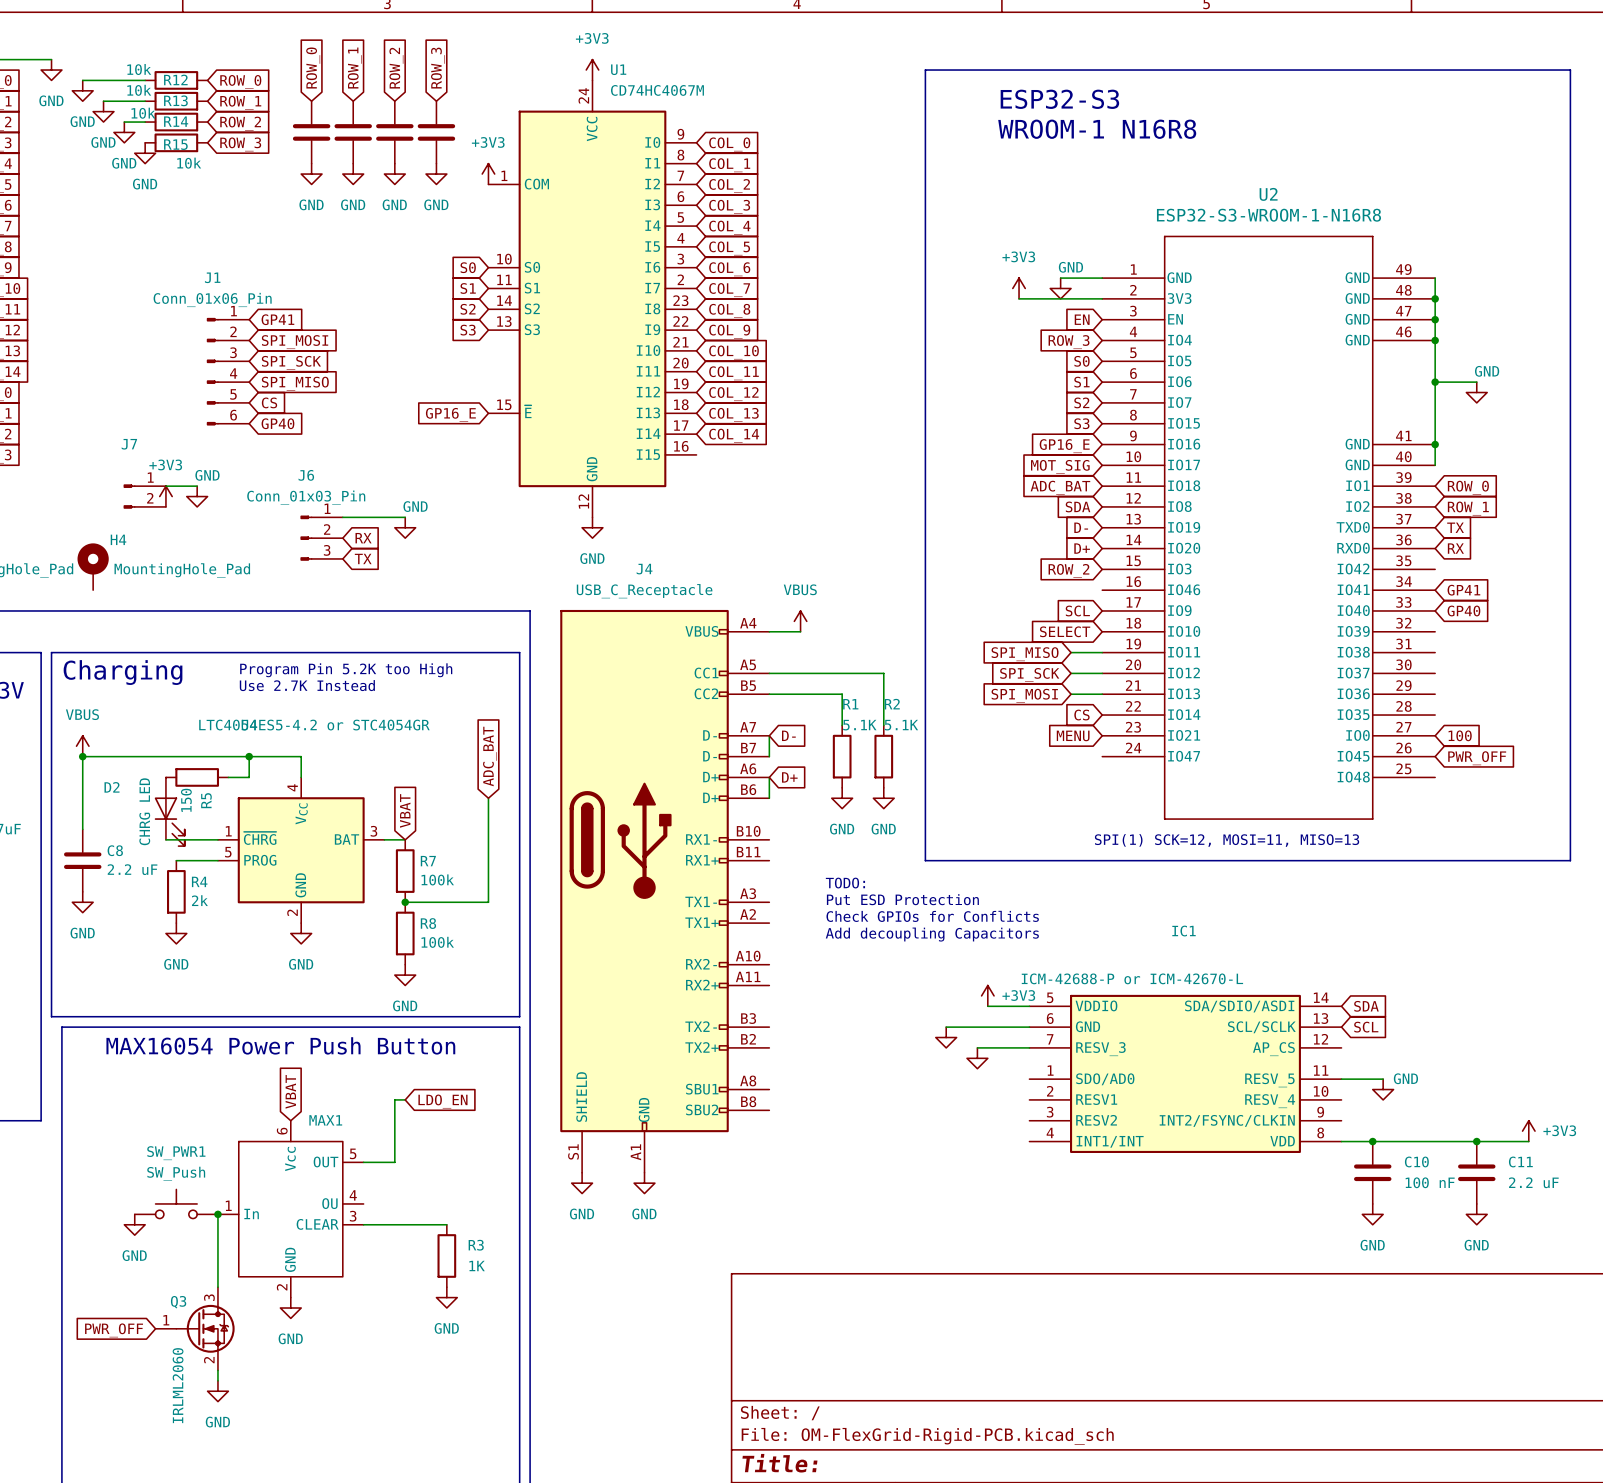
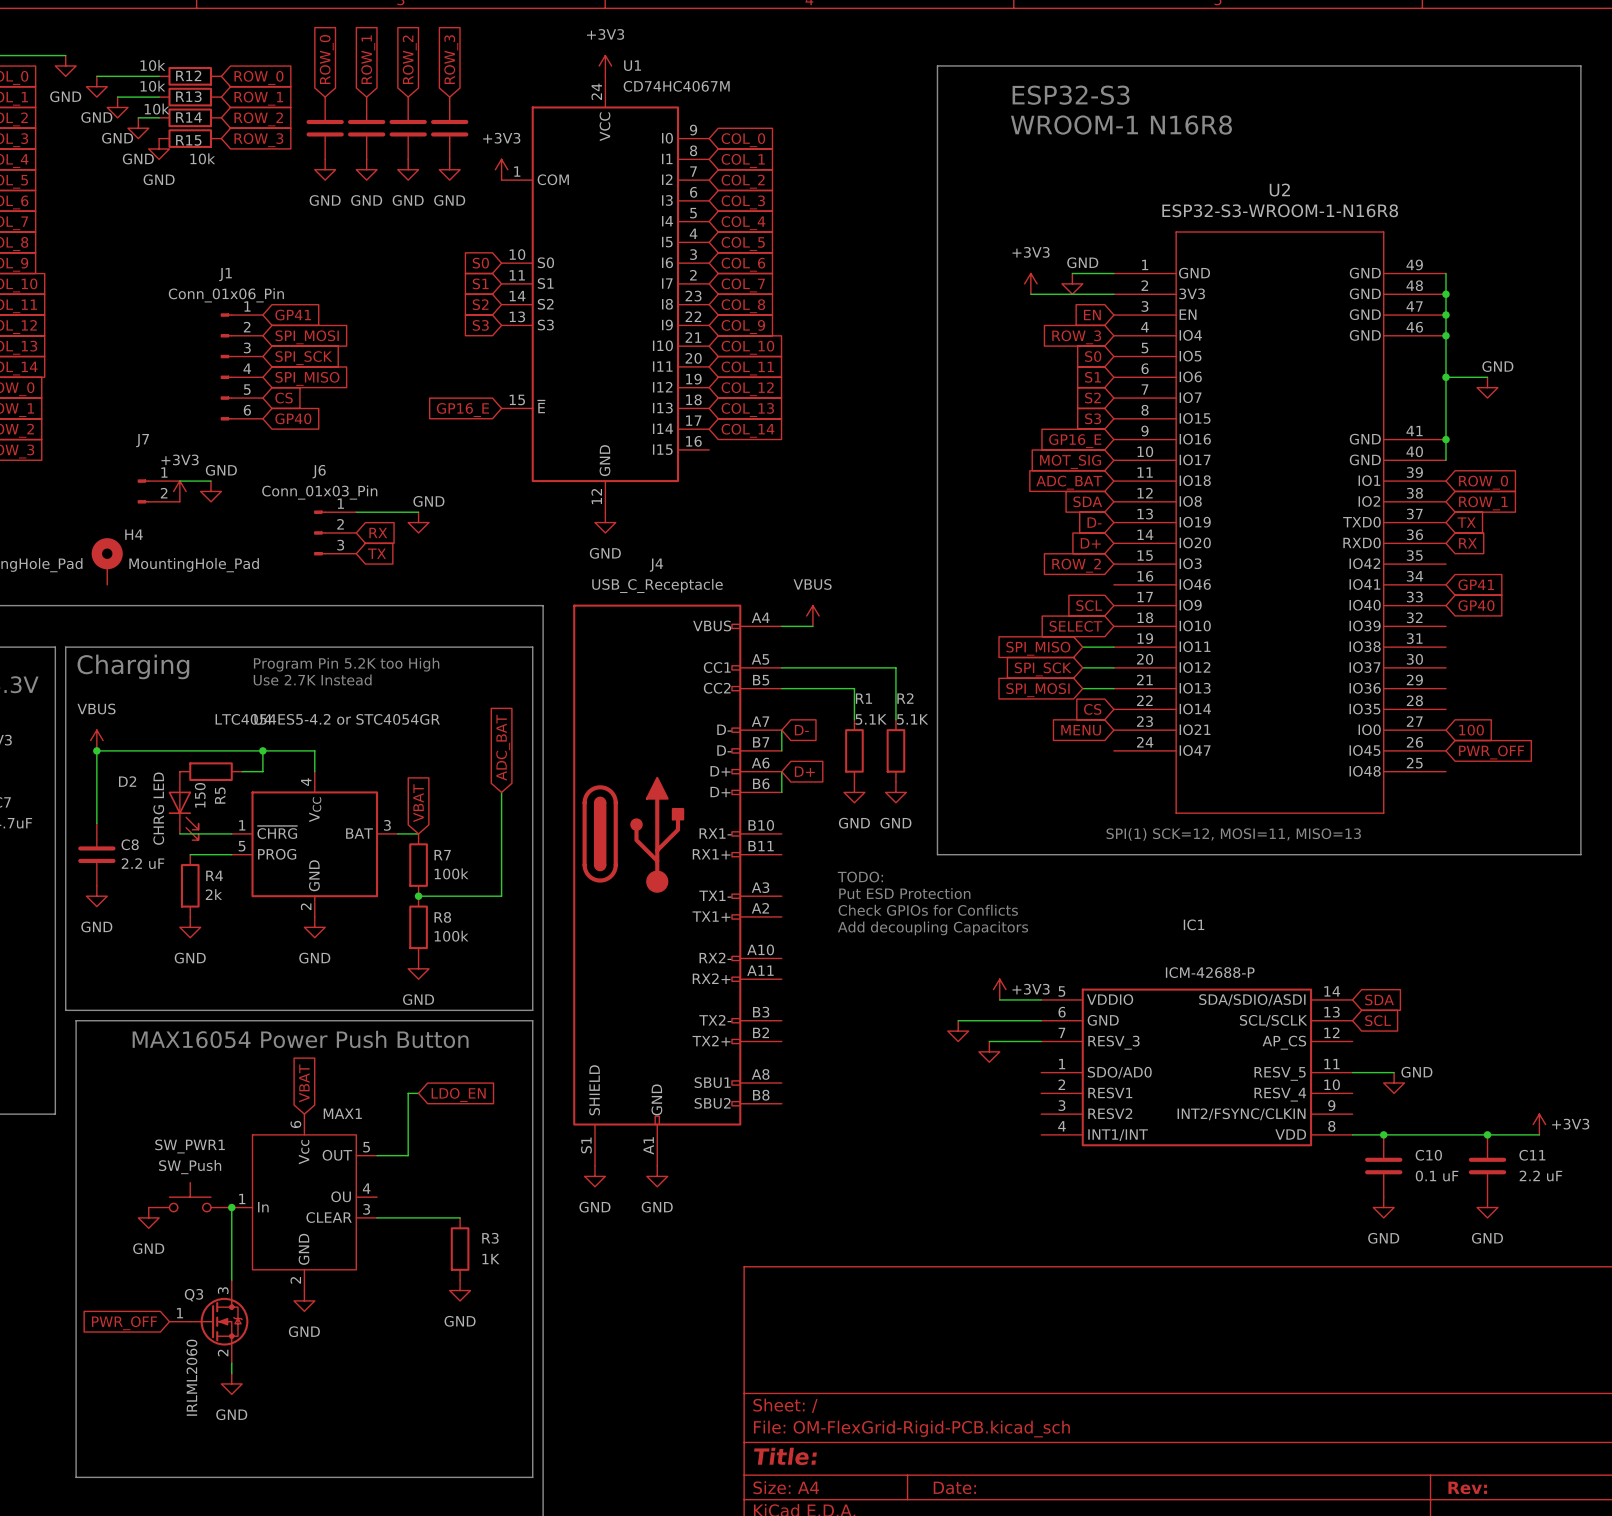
IC1 value: ICM-42688-P or ICM-42670-L (1132, 978) -> ICM-42688-P (1210, 972)
C10 value: 100 nF (1430, 1182) -> 0.1 uF (1437, 1176)

